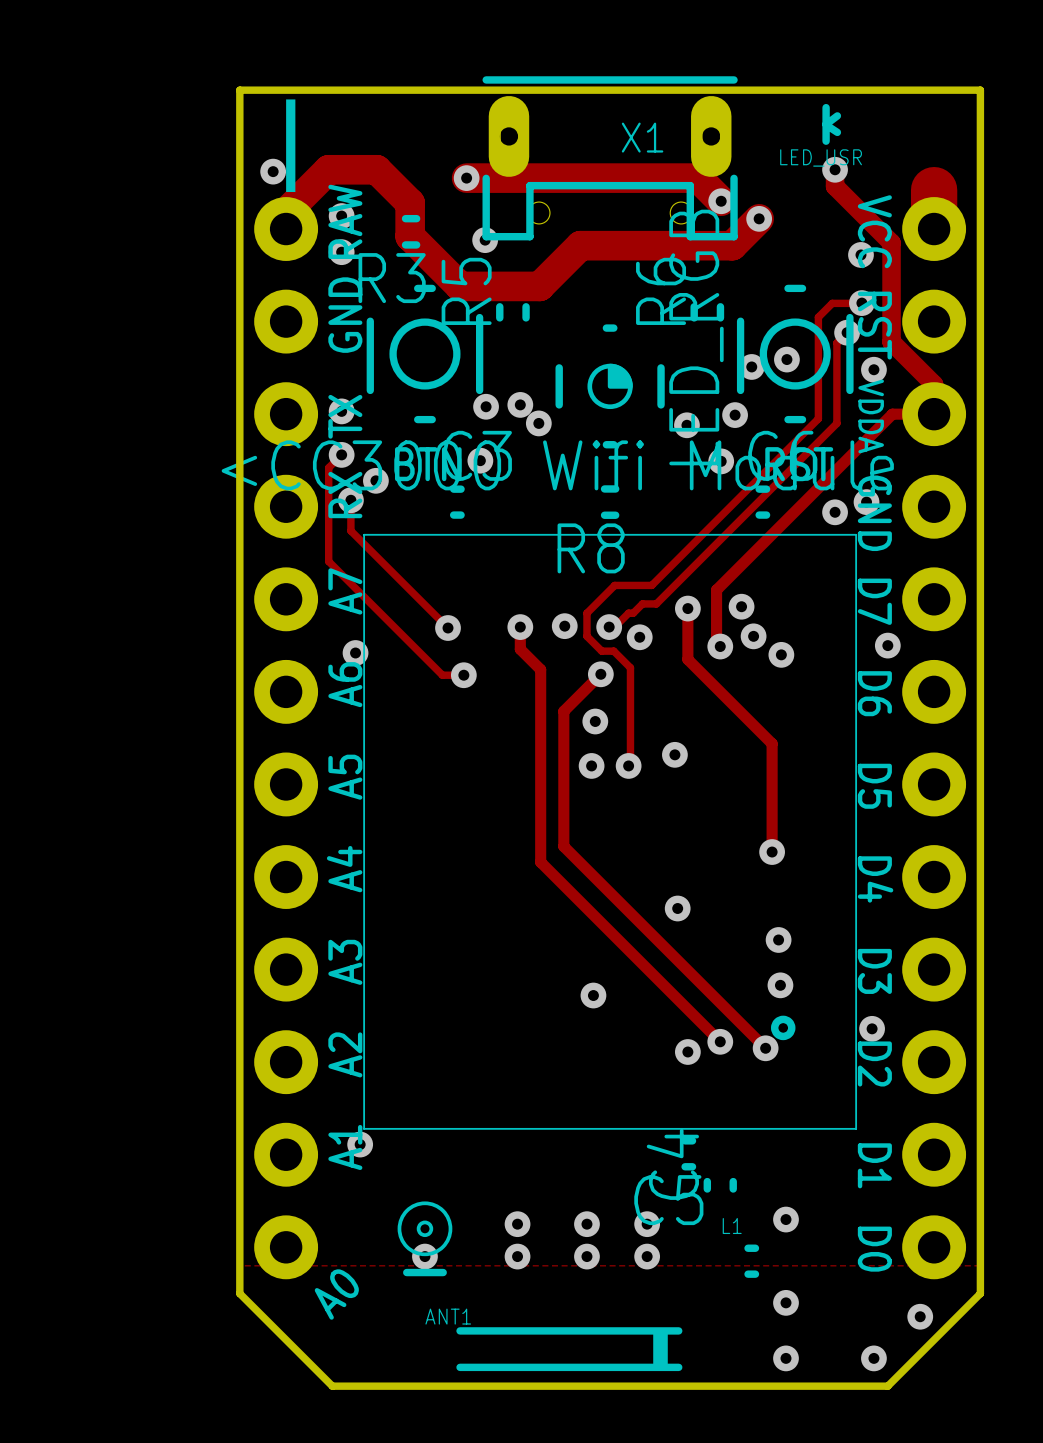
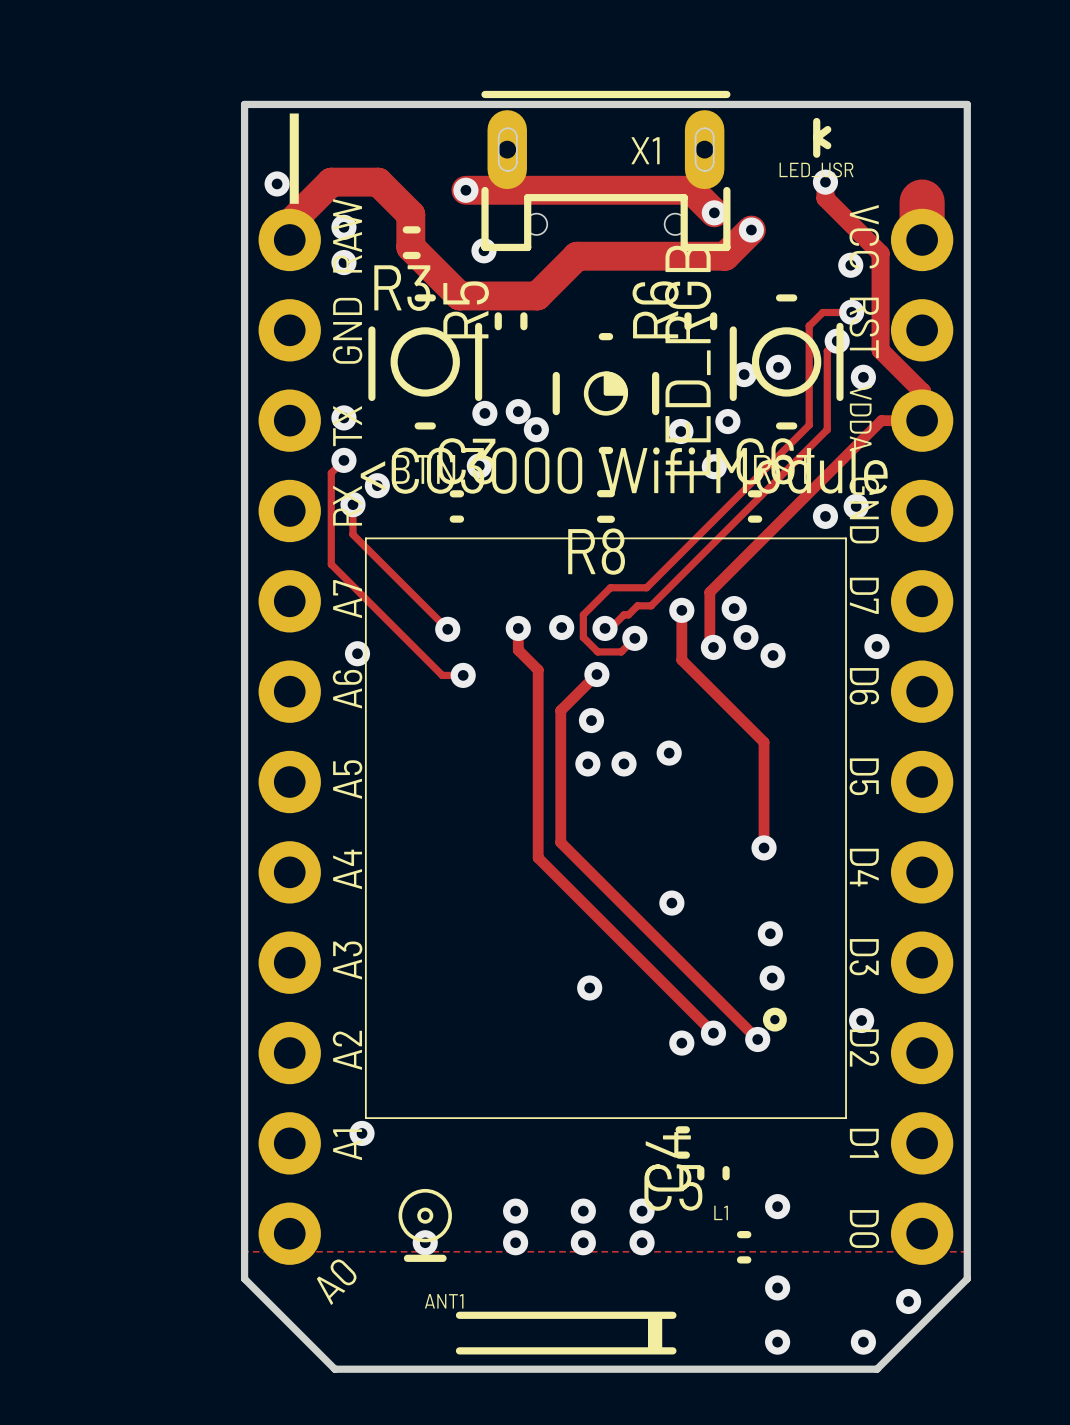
track: (613, 651) (630, 667) (630, 764) (628, 765) -> (609, 651) (621, 651) (634, 638)

